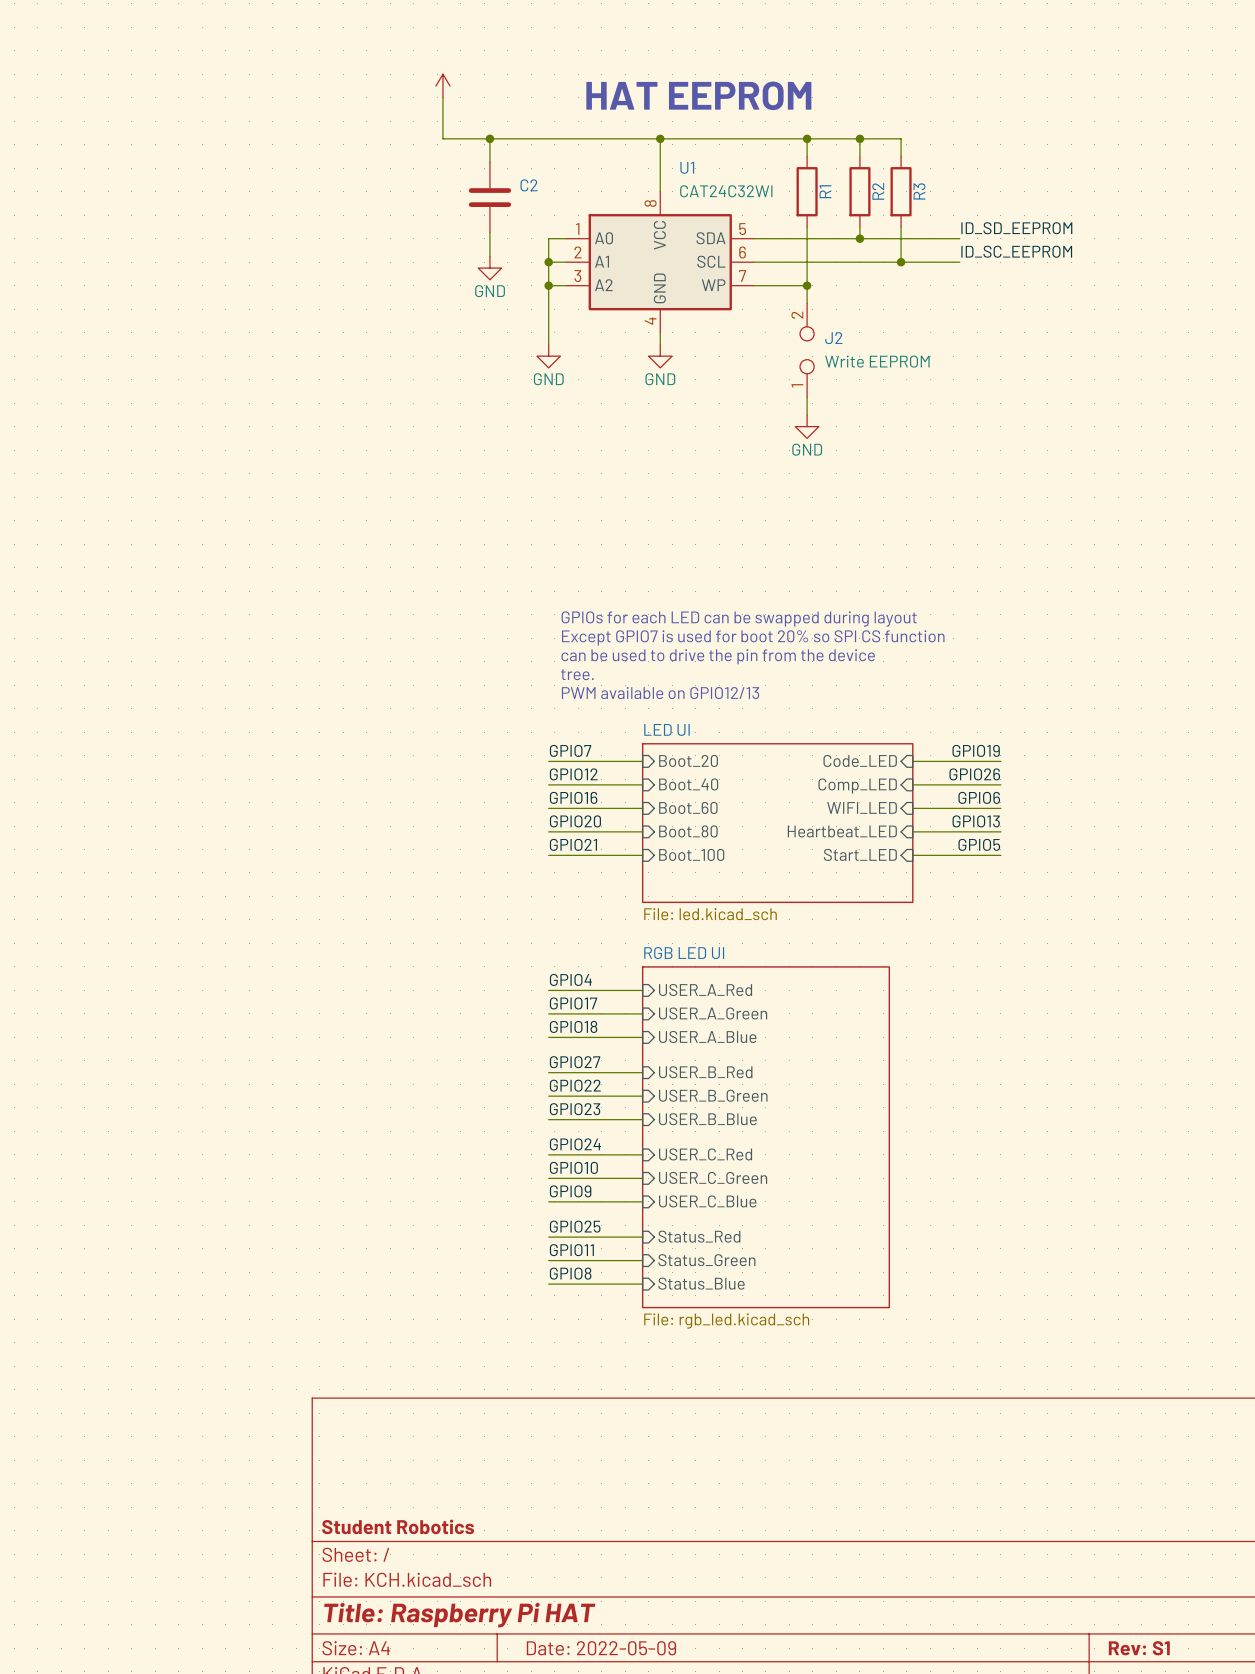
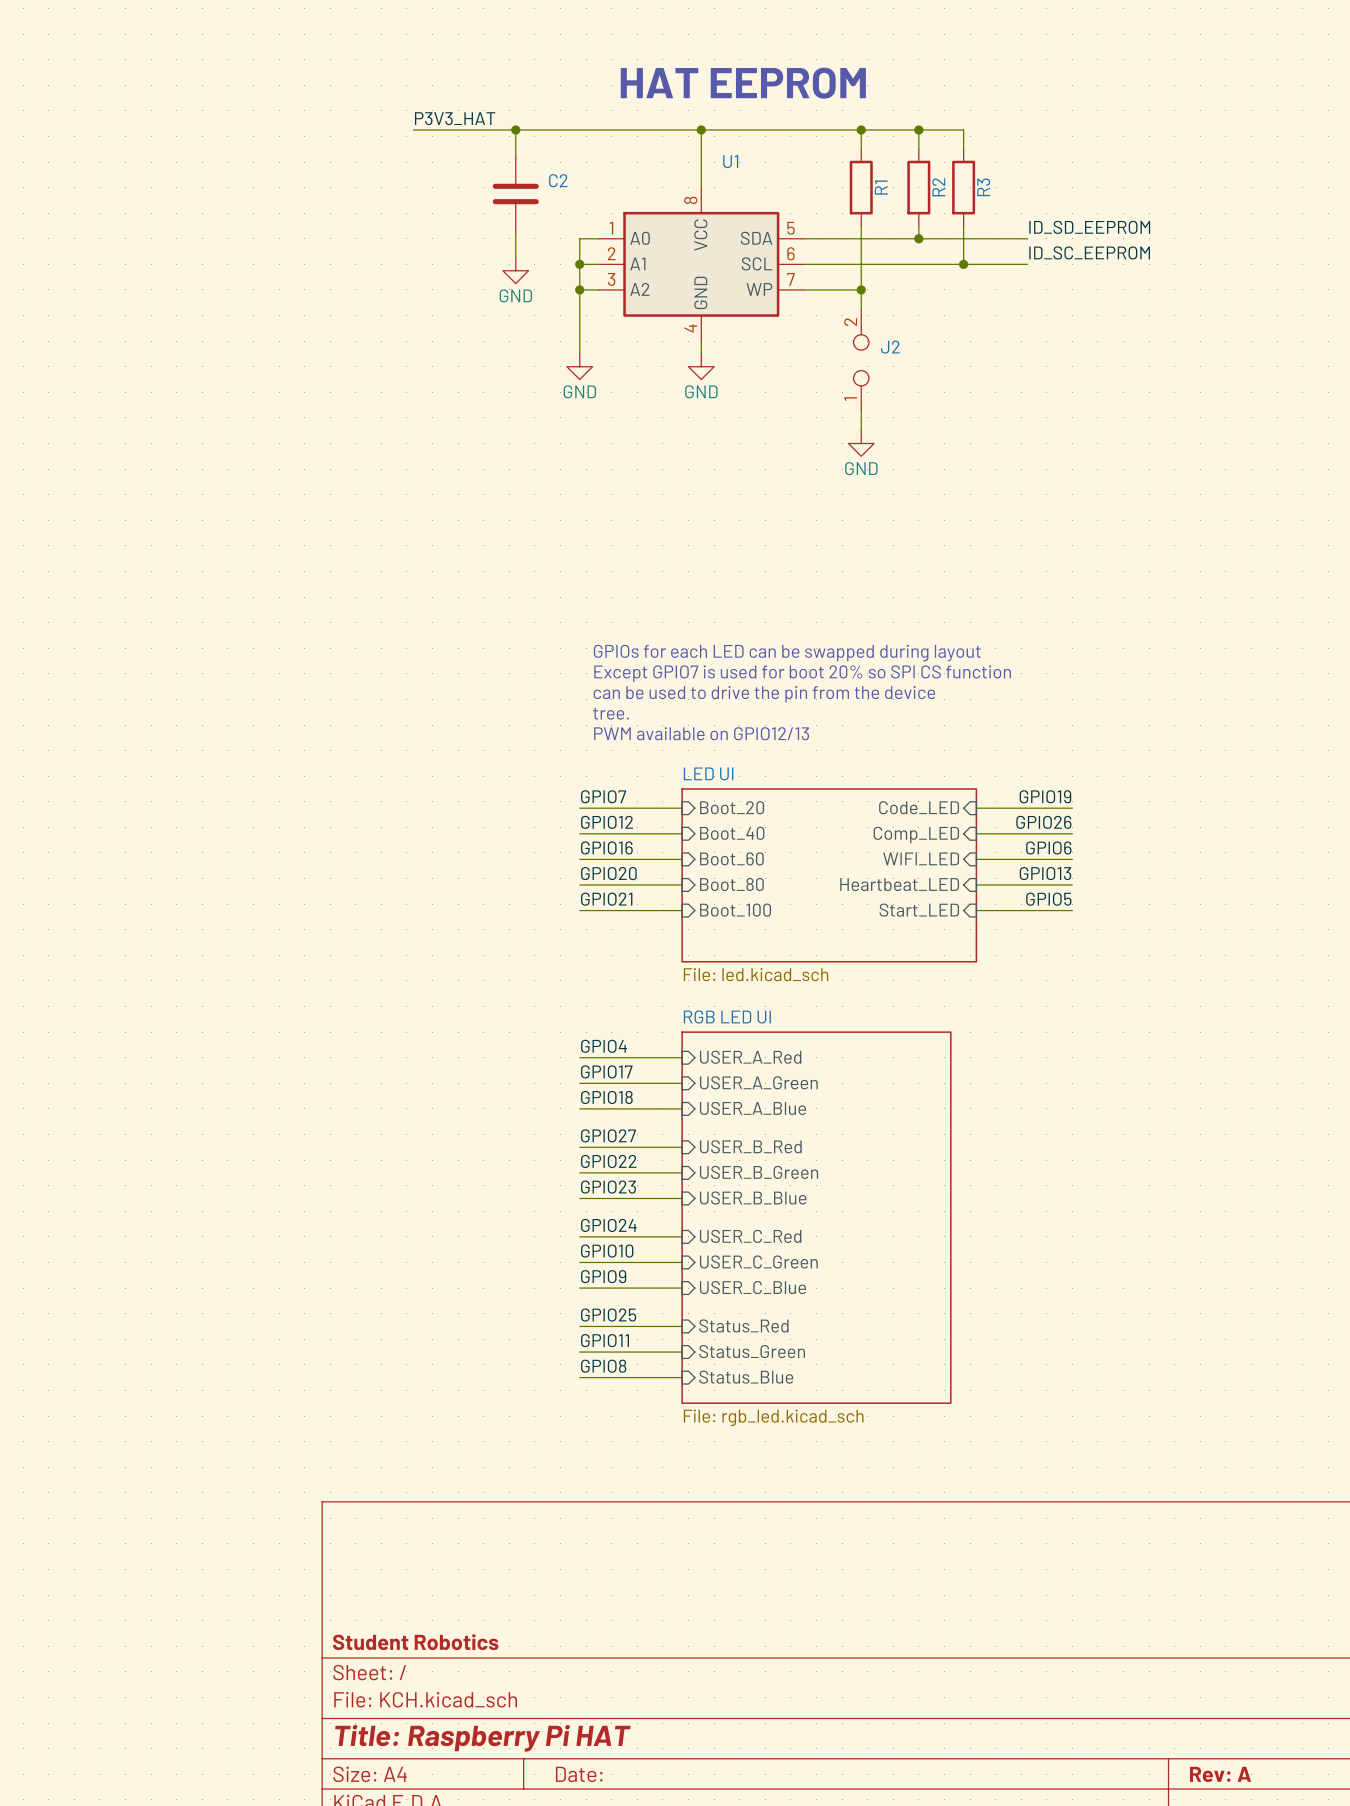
power symbol: (442, 86) -> none
wire: (442, 97) (442, 138) -> (413, 130) (464, 130)
label: none -> P3V3_HAT (455, 118)
U1 value: CAT24C32WI (726, 191) -> none
J2 value: Write EEPROM (877, 361) -> none
title block: Date: 2022-05-09 (601, 1648) -> Date: (579, 1774)
title block: Rev: S1 (1139, 1648) -> Rev: A (1220, 1774)

